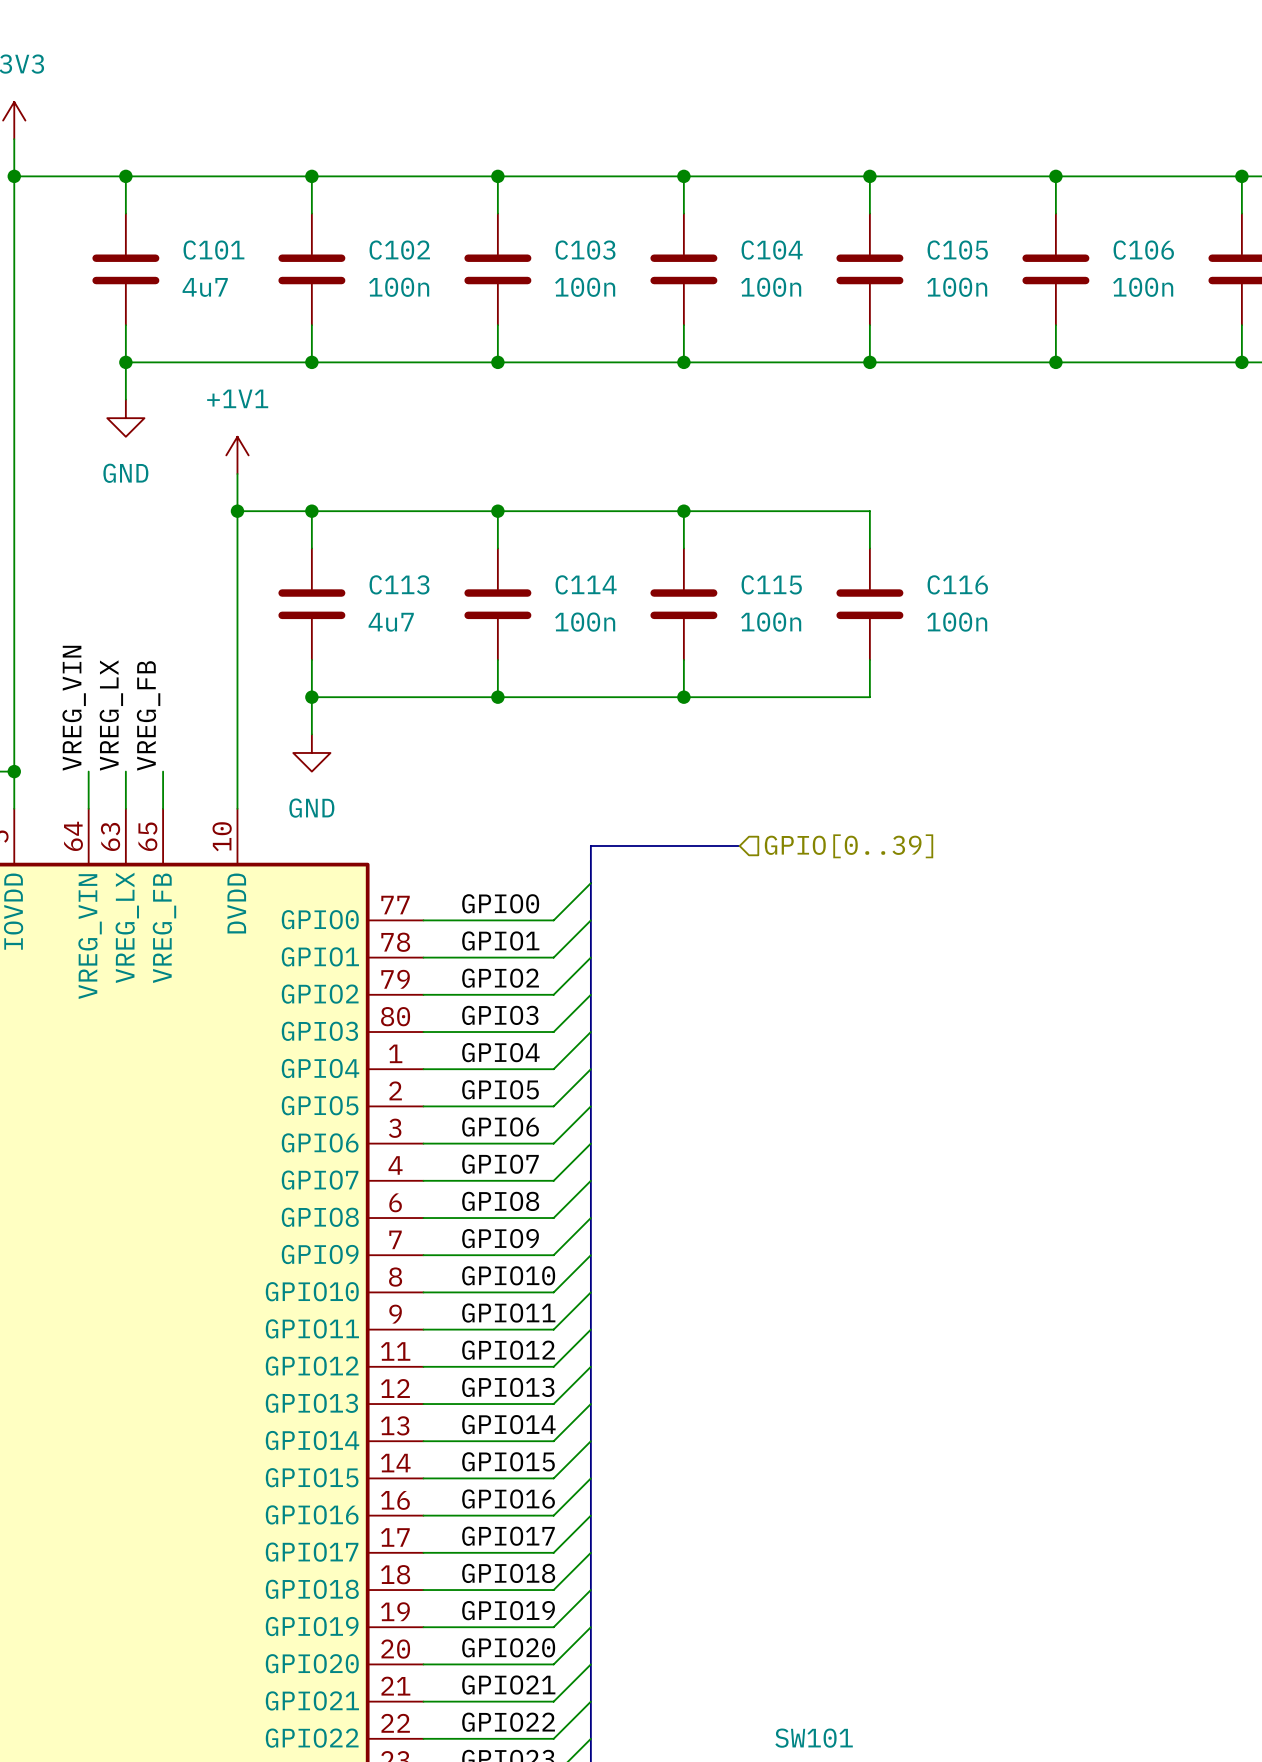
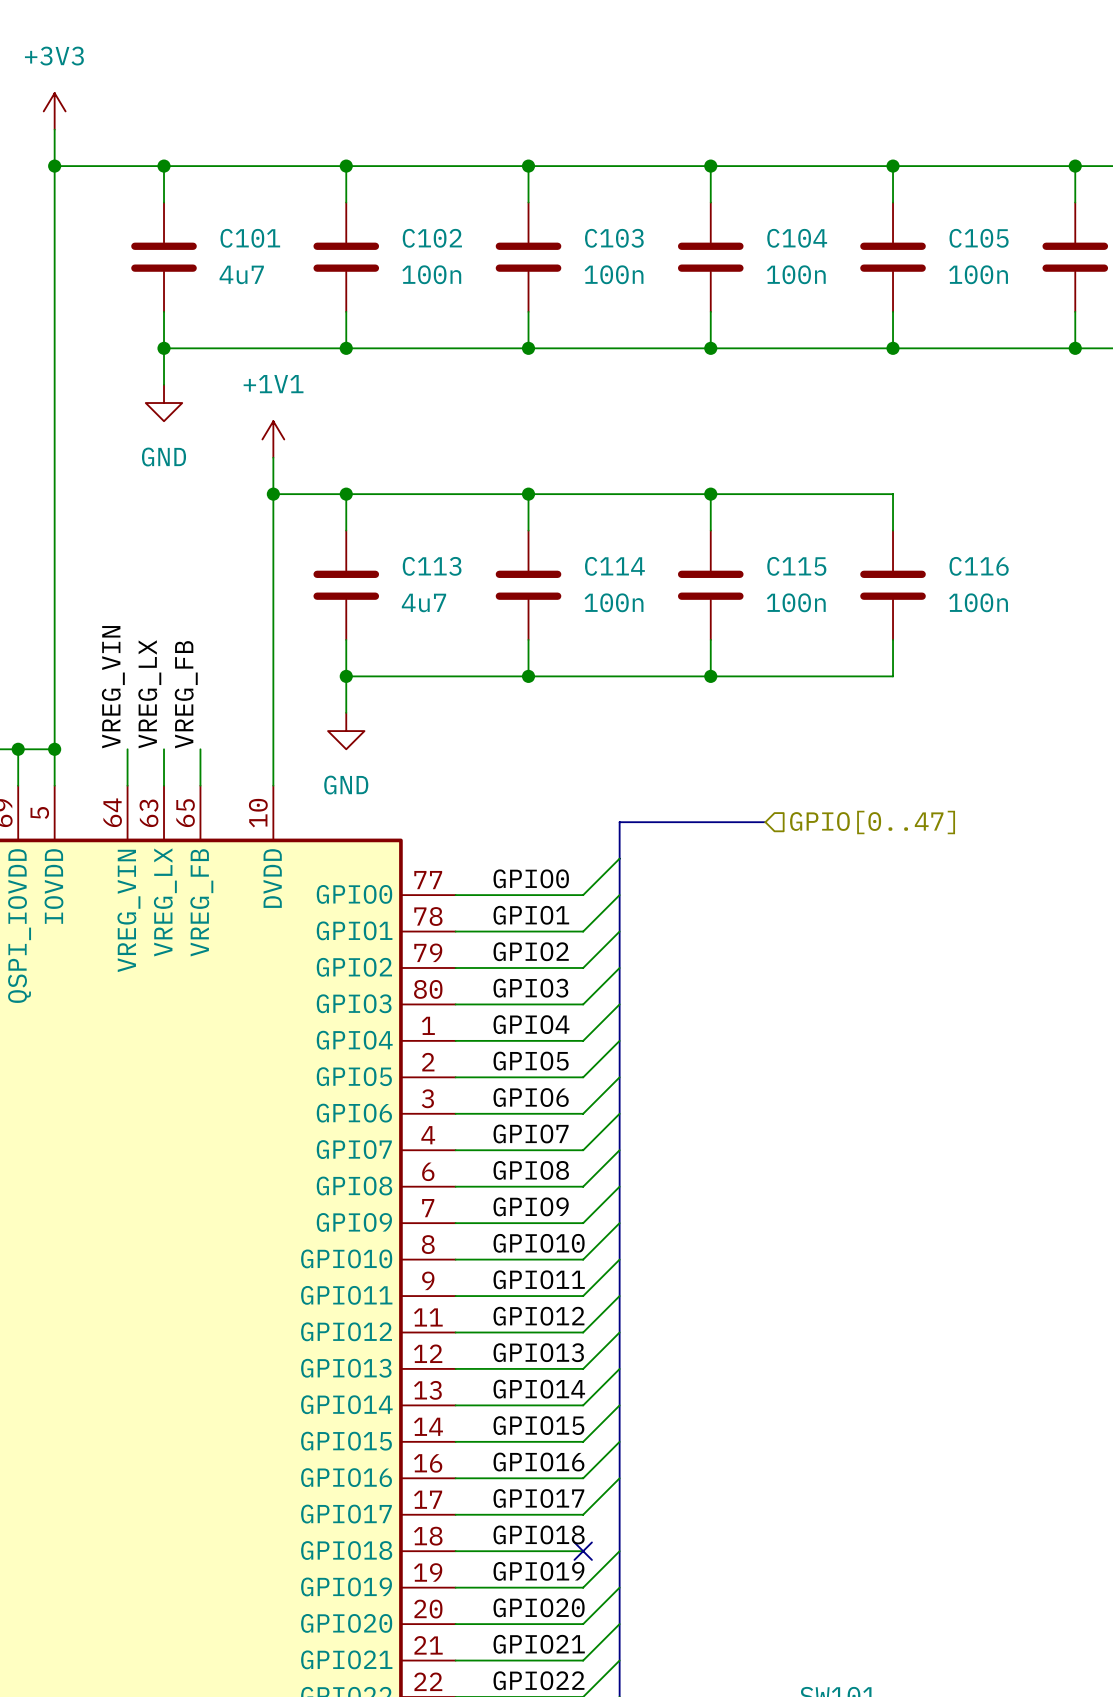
hierarchical label: GPIO[0..39] (849, 846) -> GPIO[0..47] (872, 822)
wire: (590, 1552) (553, 1590) -> none
no-connect mark: none -> (583, 1551)

